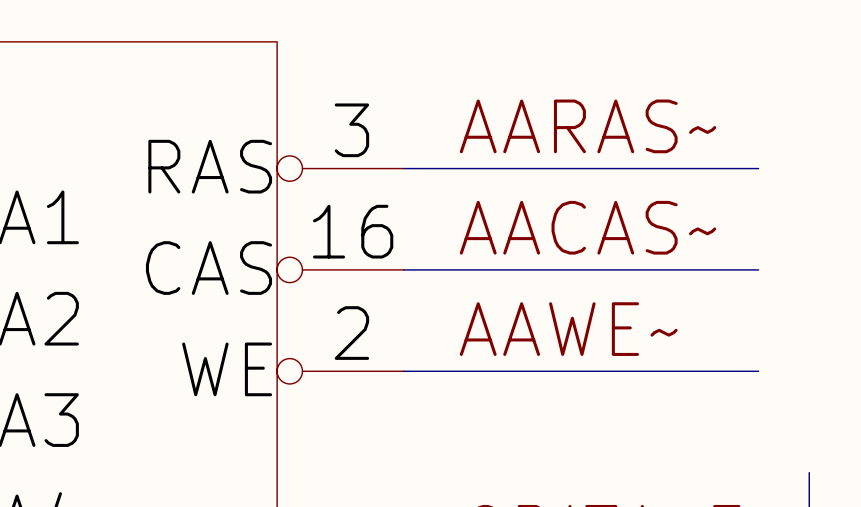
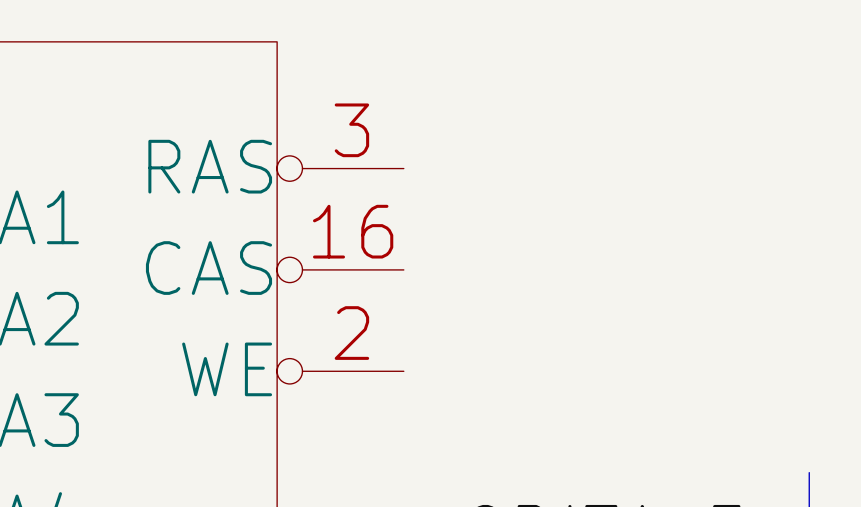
label: AARAS~ (588, 126) -> none
wire: (403, 168) (758, 168) -> none
label: AACAS~ (588, 227) -> none
wire: (403, 269) (758, 269) -> none
label: AAWE~ (568, 329) -> none
wire: (403, 371) (758, 371) -> none

